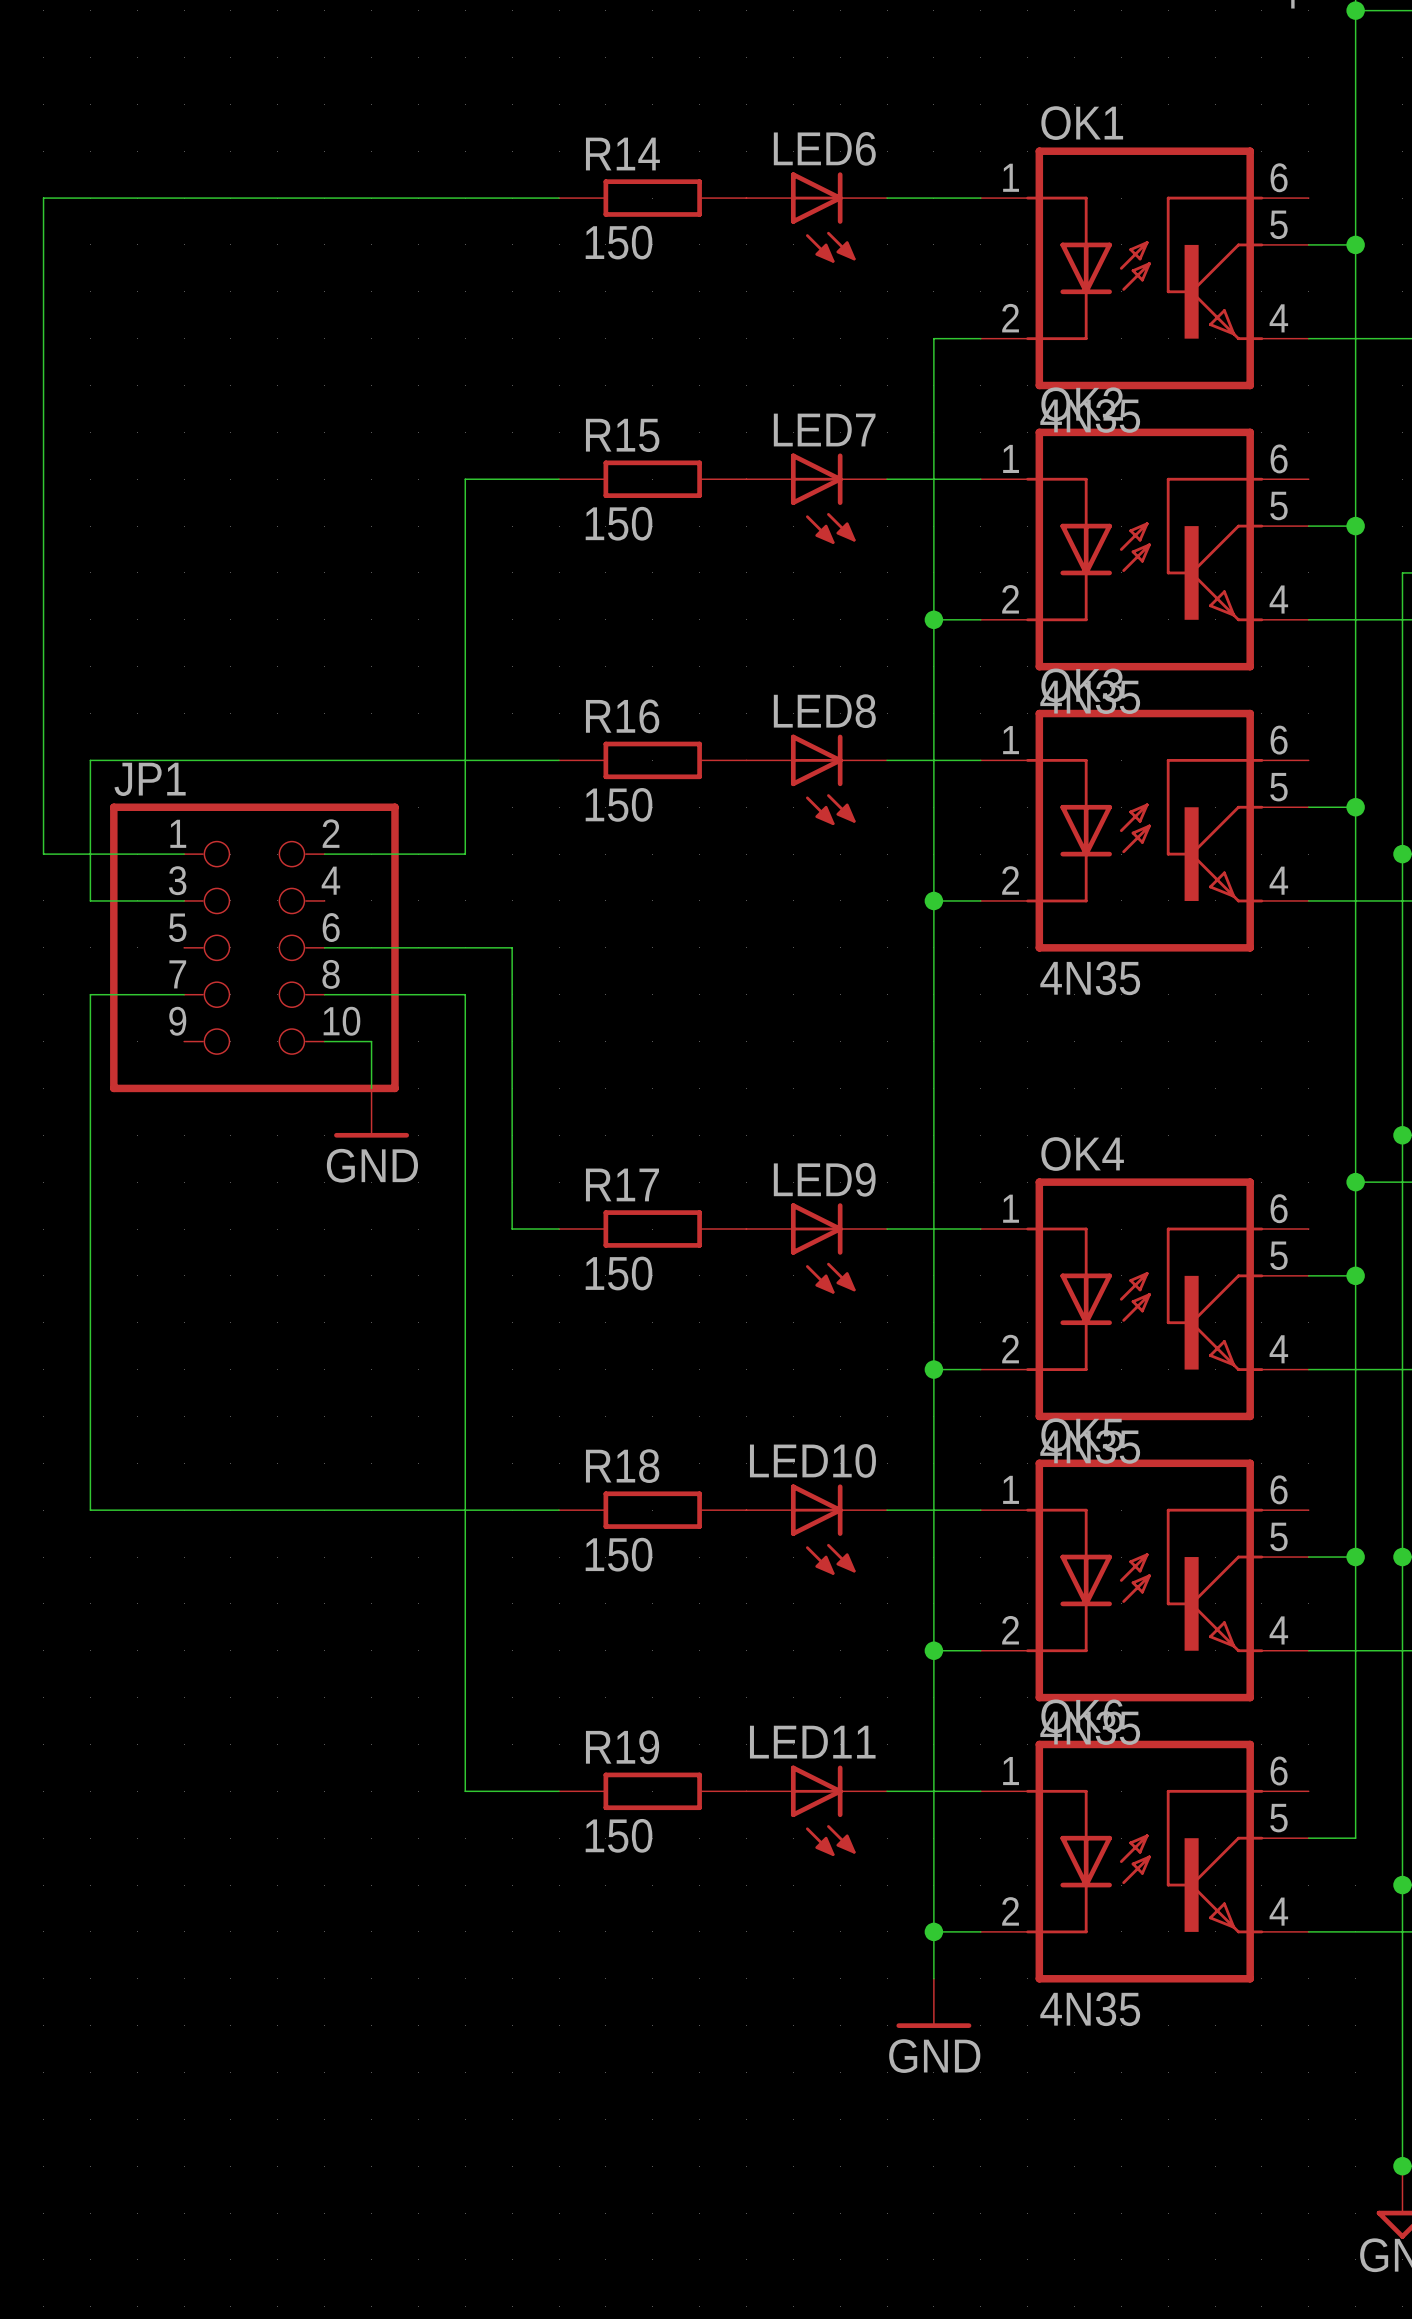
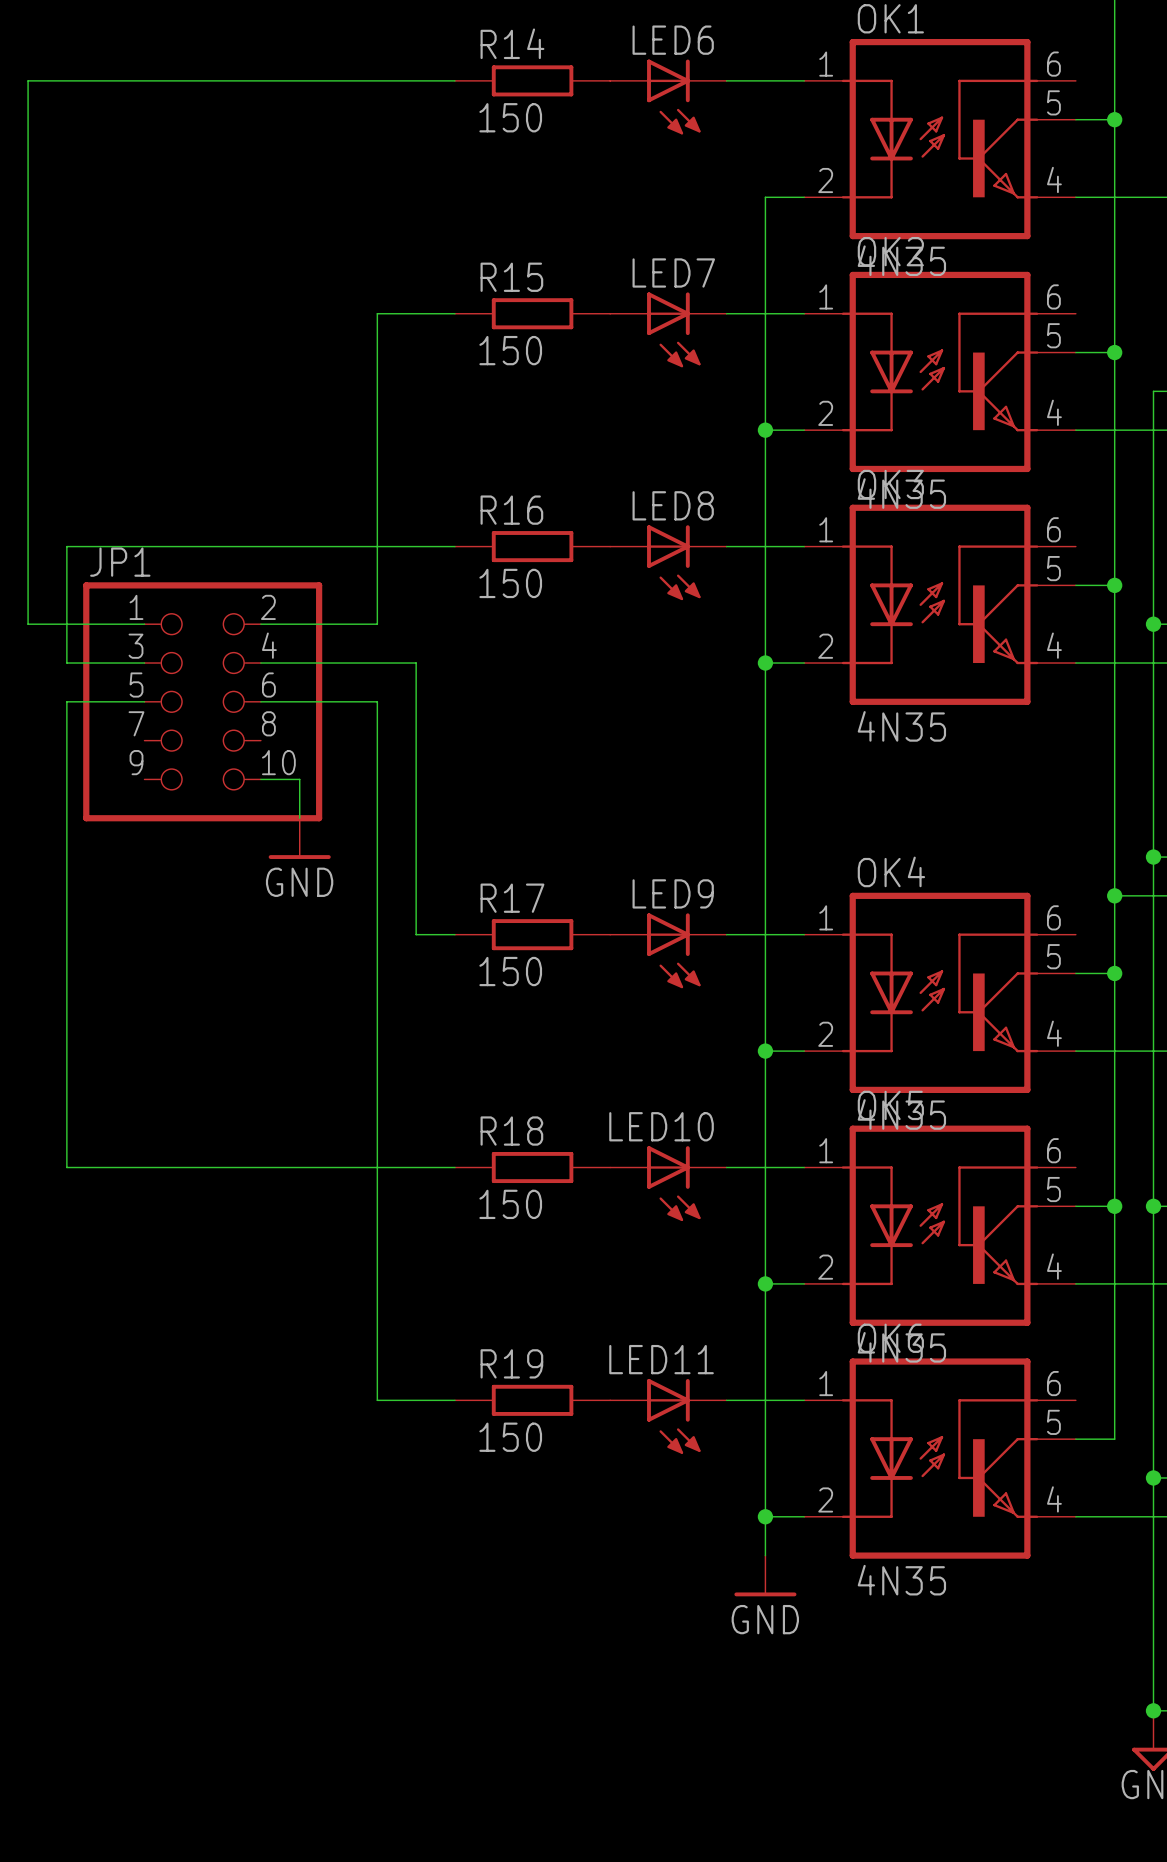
wire: none -> (260, 663) (416, 663) (416, 701)
wire: (465, 947) (512, 947) -> (377, 701) (377, 740)
wire: (90, 994) (184, 994) -> (66, 740) (66, 701) (144, 701)
wire: (324, 994) (465, 994) -> none

